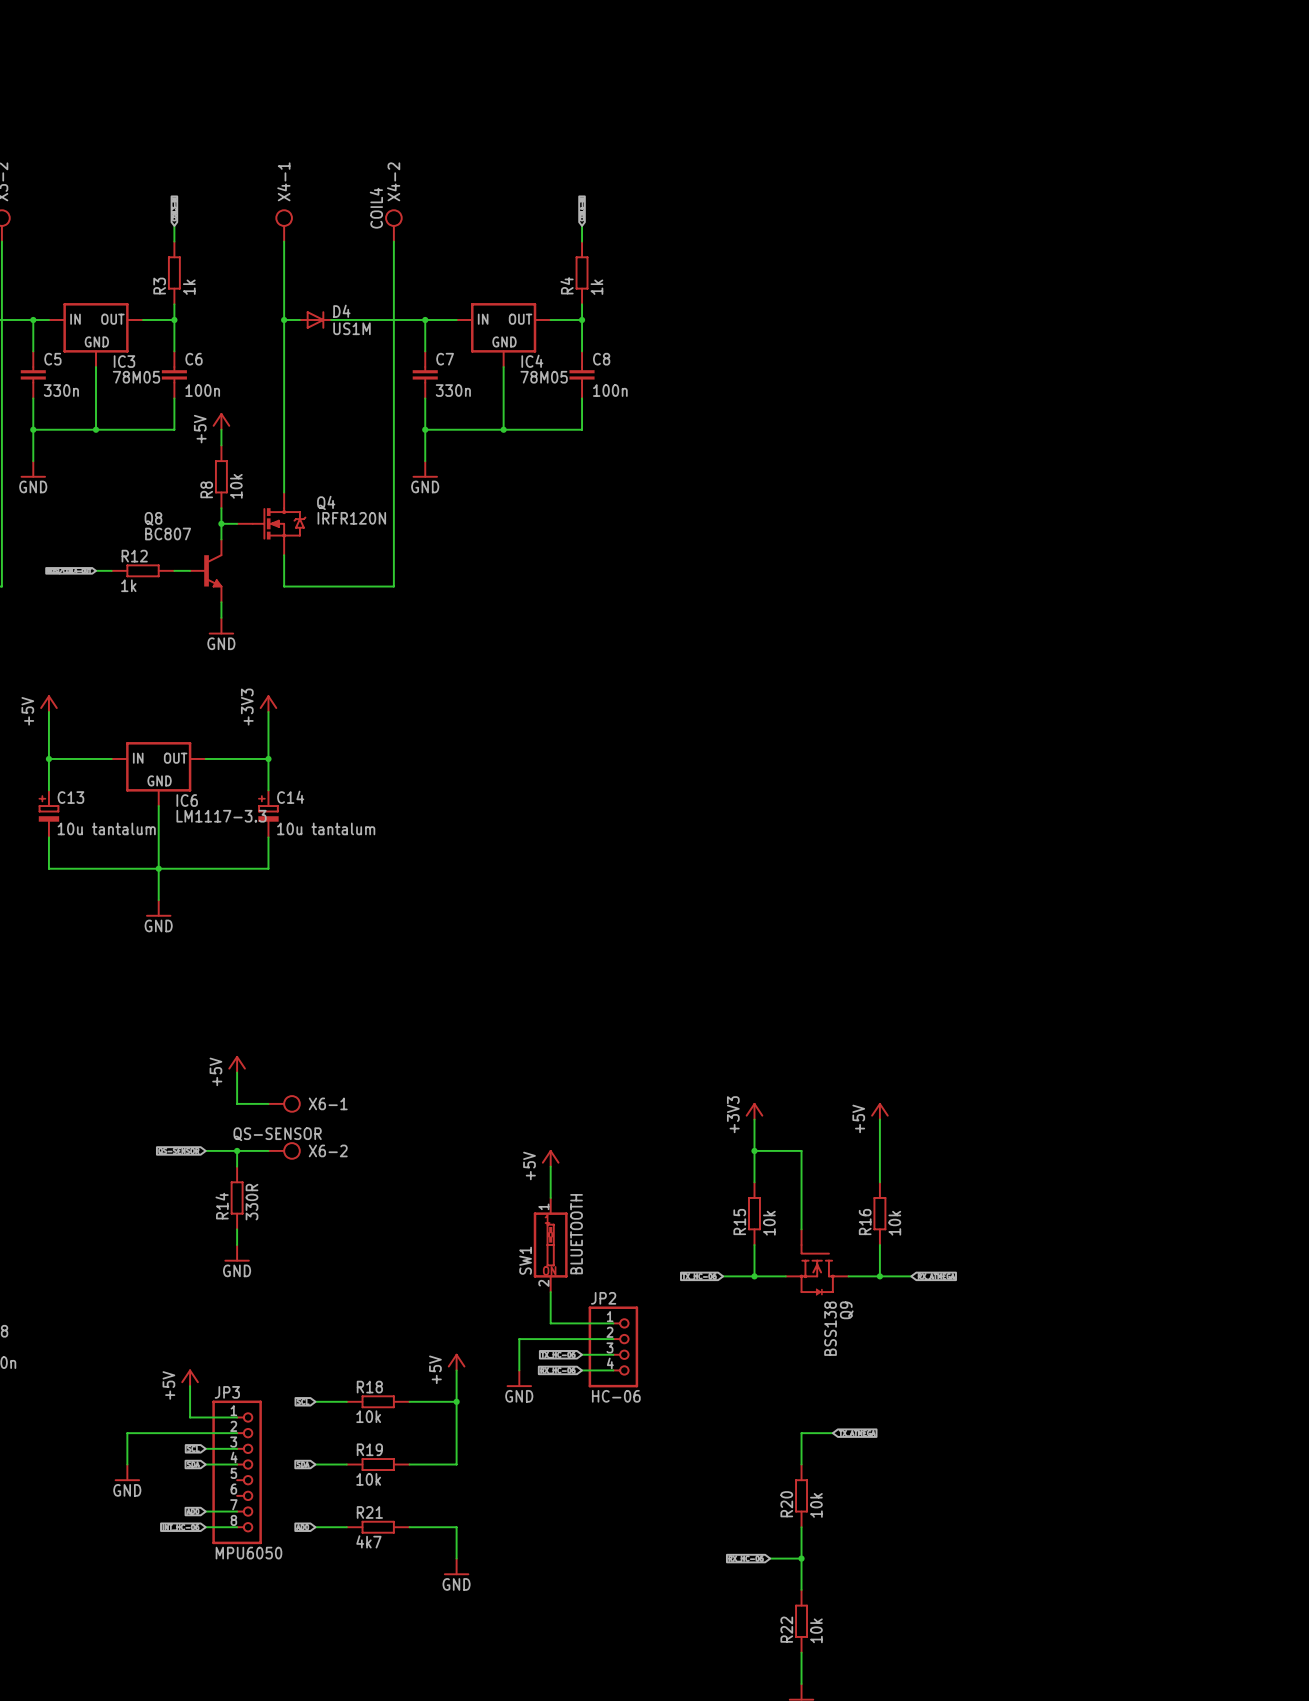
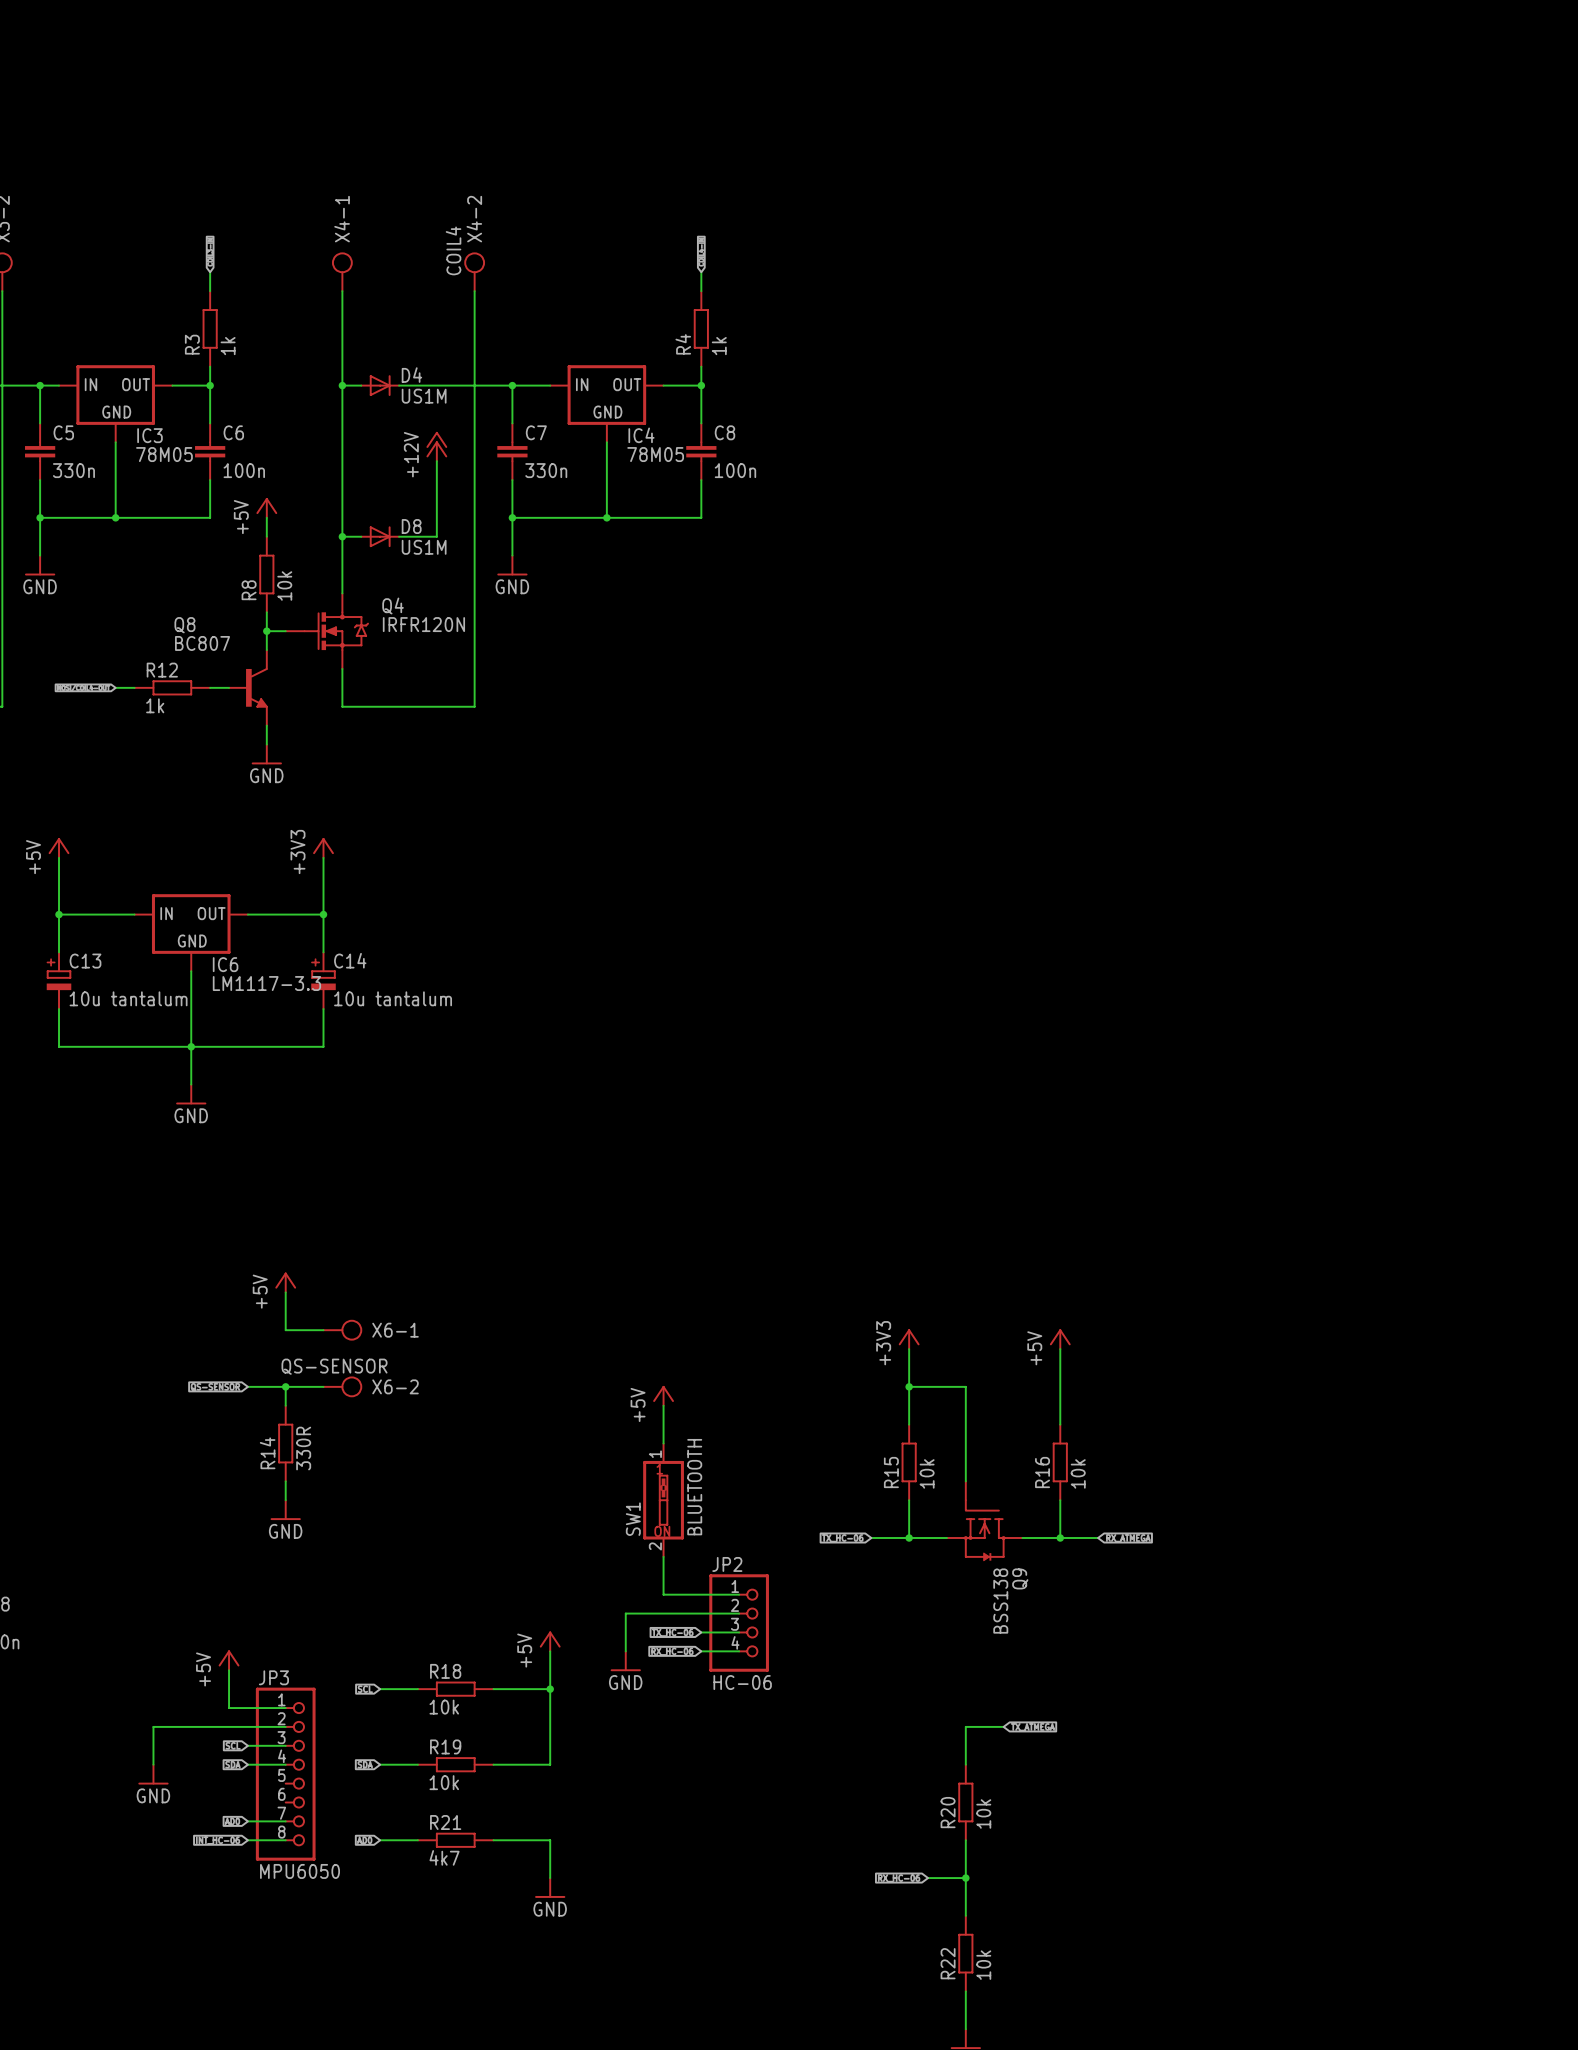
power symbol: none -> +12V (436, 446)
wire: none -> (436, 461) (436, 536) (399, 536)
wire: none -> (342, 536) (361, 536)
junction: none -> (342, 536)
D8: none -> US1M (380, 536)

